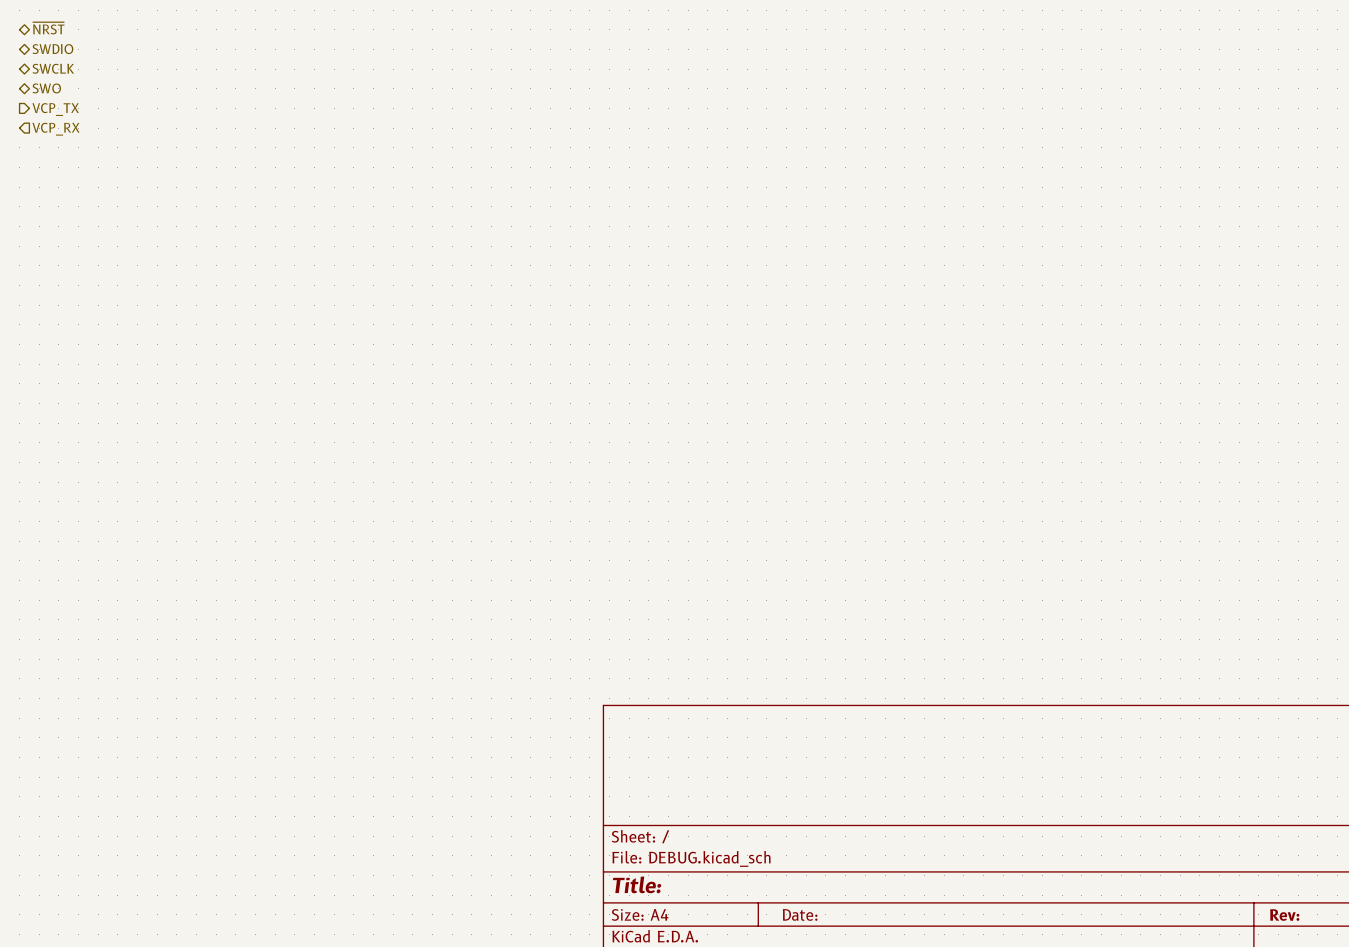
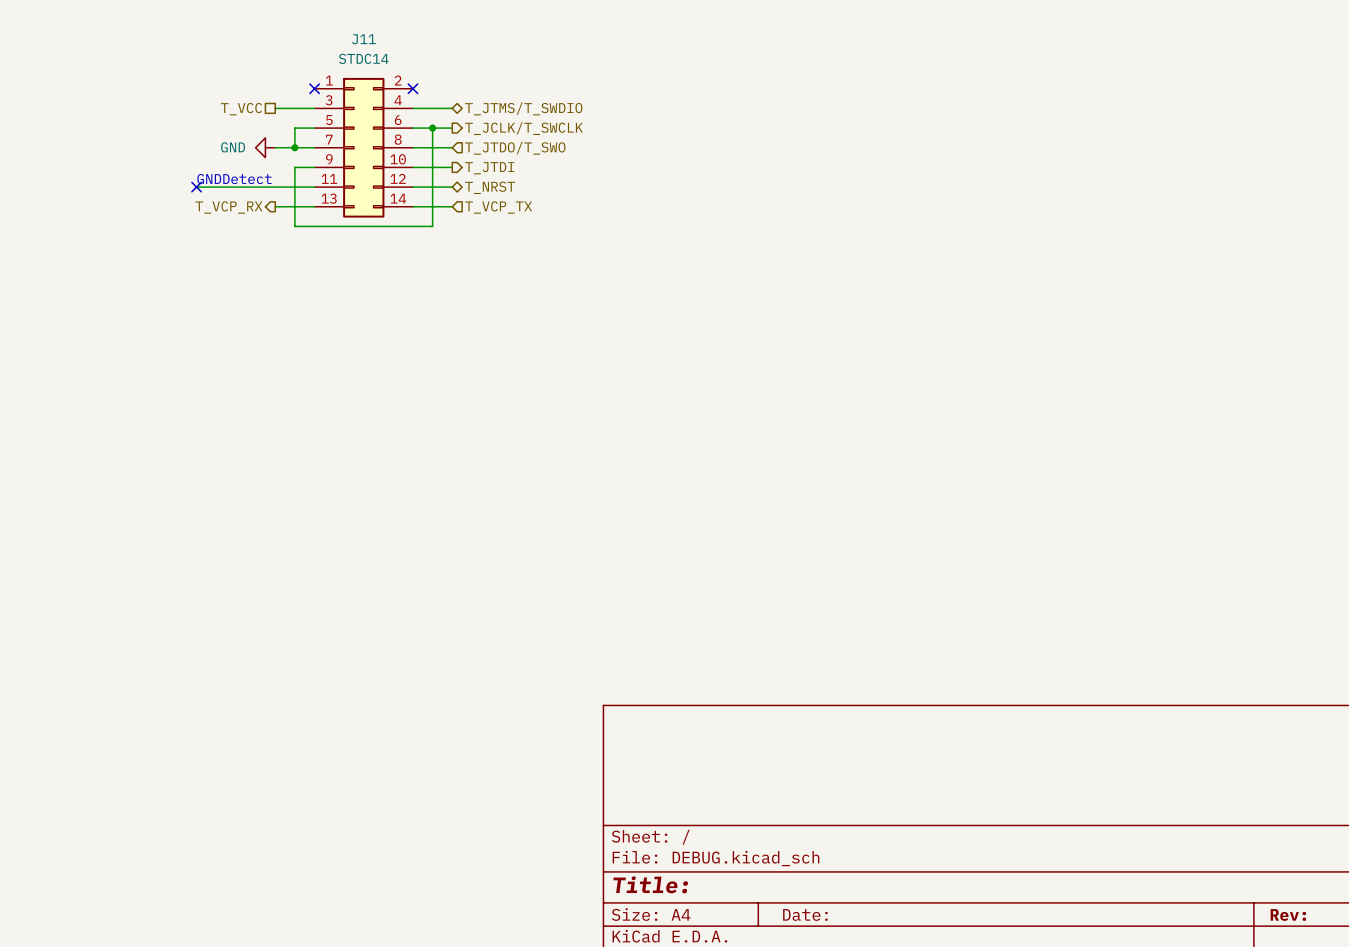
hierarchical label: ~{NRST} (48, 28) -> none
hierarchical label: SWDIO (52, 49) -> none
hierarchical label: SWCLK (53, 68) -> none
hierarchical label: SWO (46, 88) -> none
no-connect mark: none -> (314, 88)
no-connect mark: none -> (412, 88)
wire: none -> (275, 108) (314, 108)
wire: none -> (412, 108) (452, 108)
hierarchical label: VCP_TX (55, 109) -> none
hierarchical label: none -> T_VCC (241, 109)
hierarchical label: none -> T_JTMS/T_SWDIO (523, 108)
wire: none -> (314, 128) (294, 128) (294, 147)
wire: none -> (412, 128) (452, 128)
wire: none -> (432, 128) (432, 226) (294, 226) (294, 167) (314, 167)
junction: none -> (432, 128)
hierarchical label: none -> T_JCLK/T_SWCLK (523, 128)
hierarchical label: VCP_RX (55, 129) -> none
power symbol: none -> GND (265, 147)
wire: none -> (275, 147) (314, 147)
junction: none -> (294, 147)
J11: none -> STDC14 (363, 147)
wire: none -> (412, 147) (452, 147)
hierarchical label: none -> T_JTDO/T_SWO (515, 148)
wire: none -> (412, 167) (452, 167)
hierarchical label: none -> T_JTDI (489, 168)
text: none -> GNDDetect (234, 179)
wire: none -> (196, 187) (314, 187)
no-connect mark: none -> (196, 187)
wire: none -> (412, 187) (452, 187)
hierarchical label: none -> T_NRST (490, 187)
wire: none -> (275, 206) (314, 206)
wire: none -> (412, 206) (452, 206)
hierarchical label: none -> T_VCP_RX (228, 207)
hierarchical label: none -> T_VCP_TX (498, 207)

